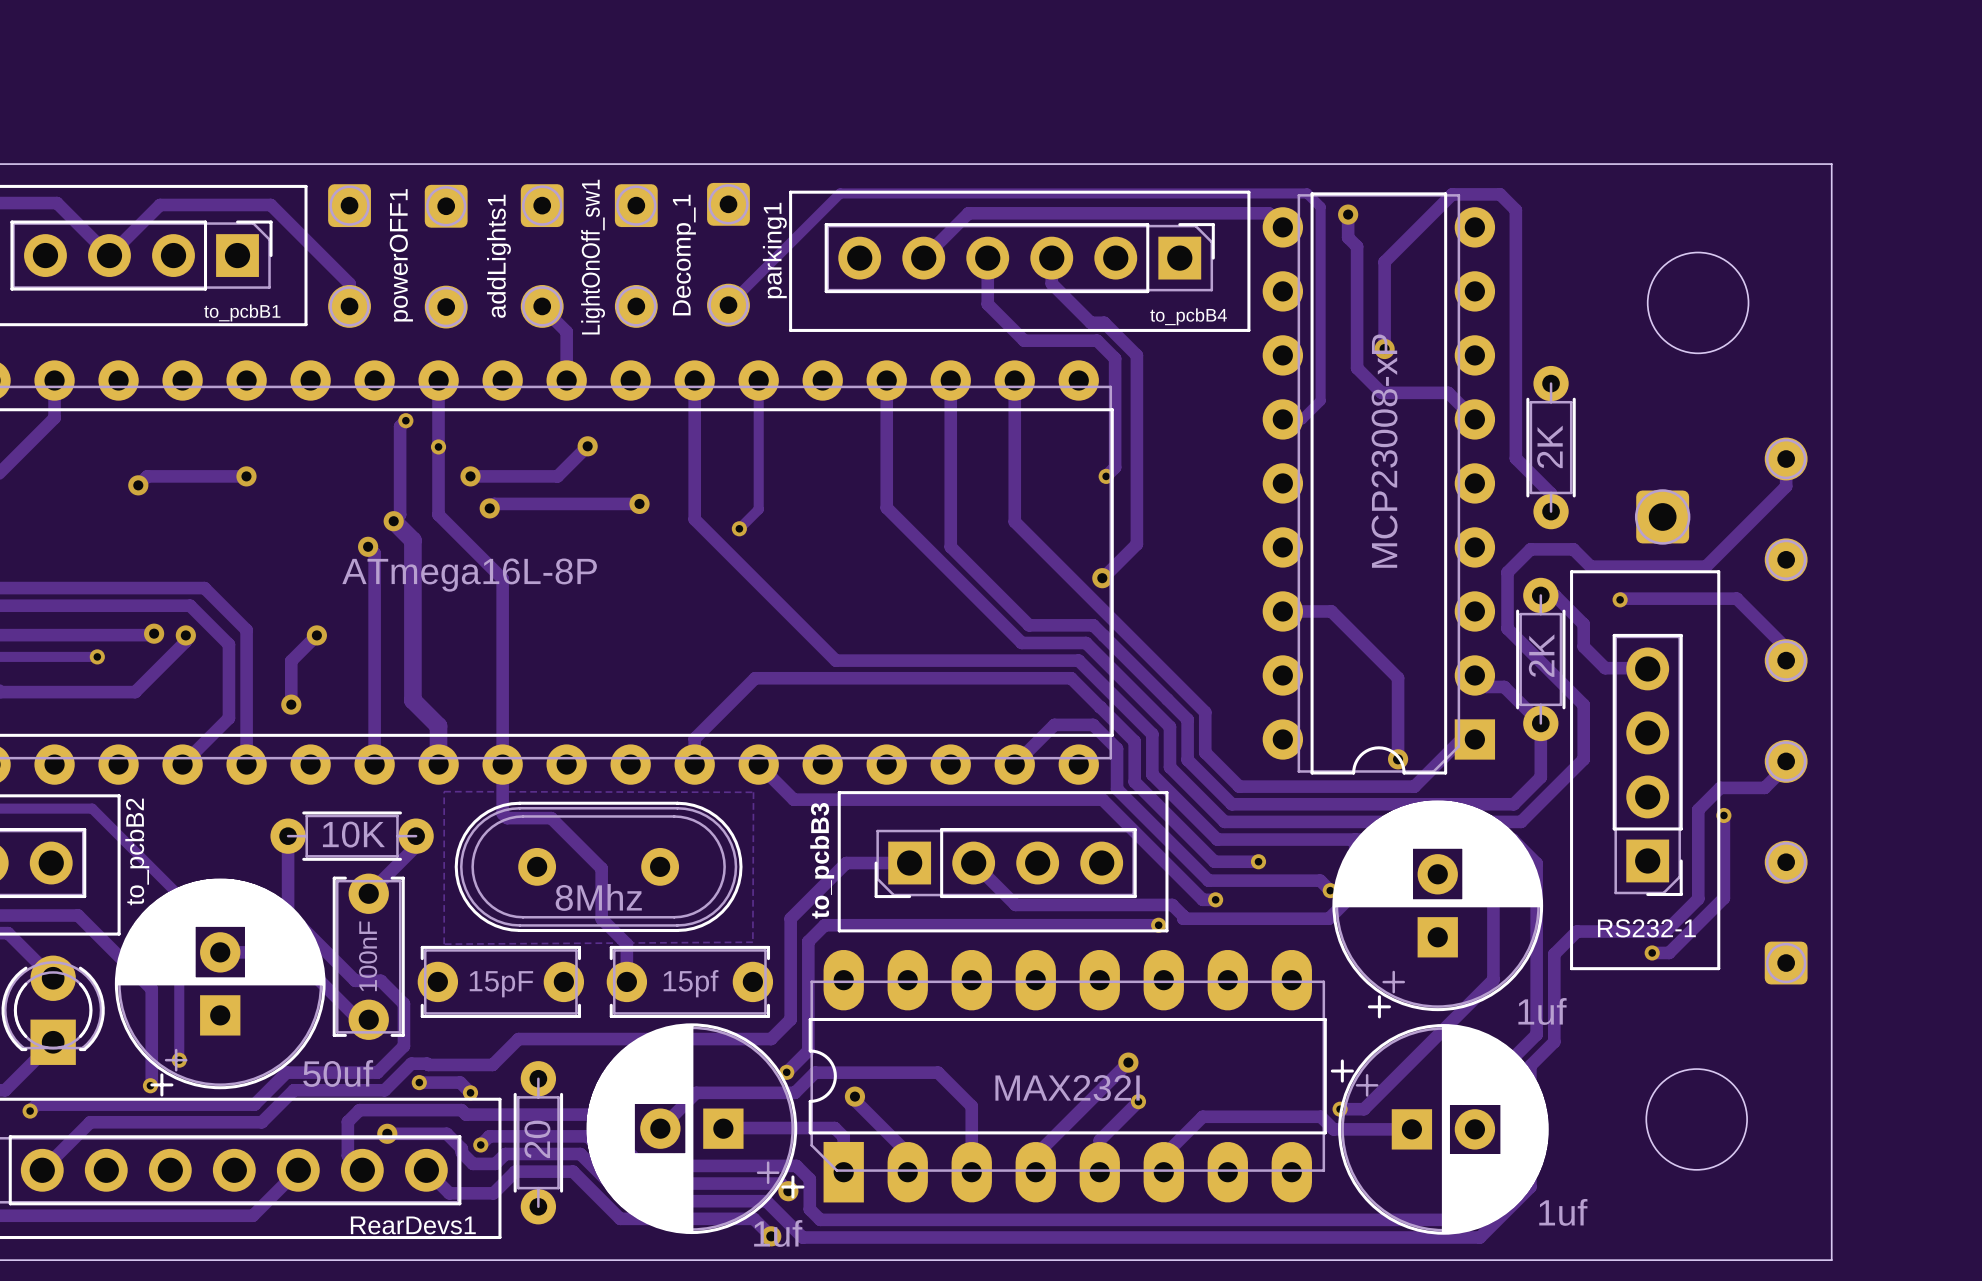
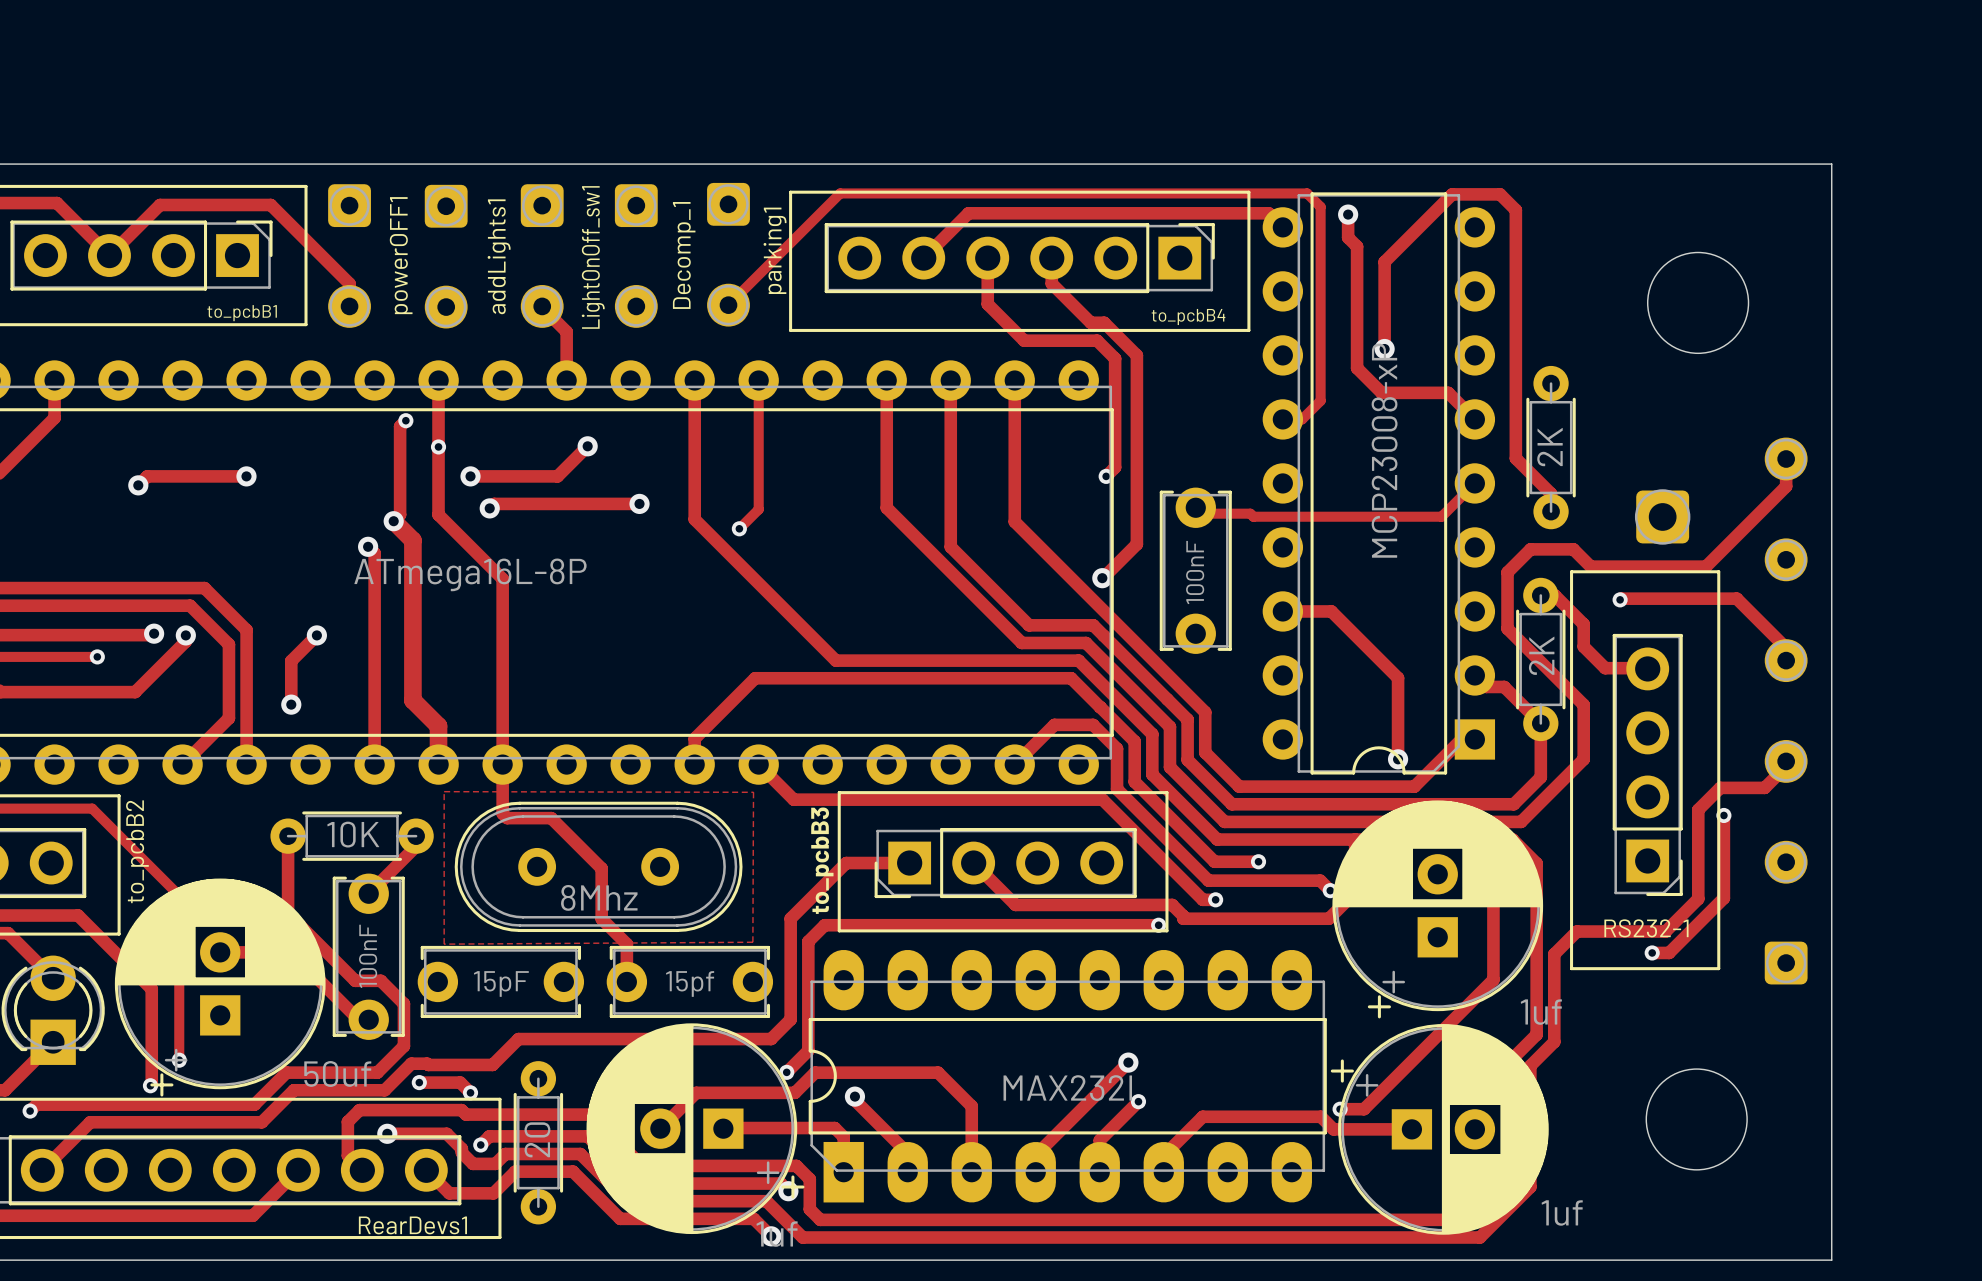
track: none -> (1474, 483) (1441, 516) (1253, 516) (1250, 513) (1201, 513) (1195, 507)
part: none -> 100nF (1195, 570)

